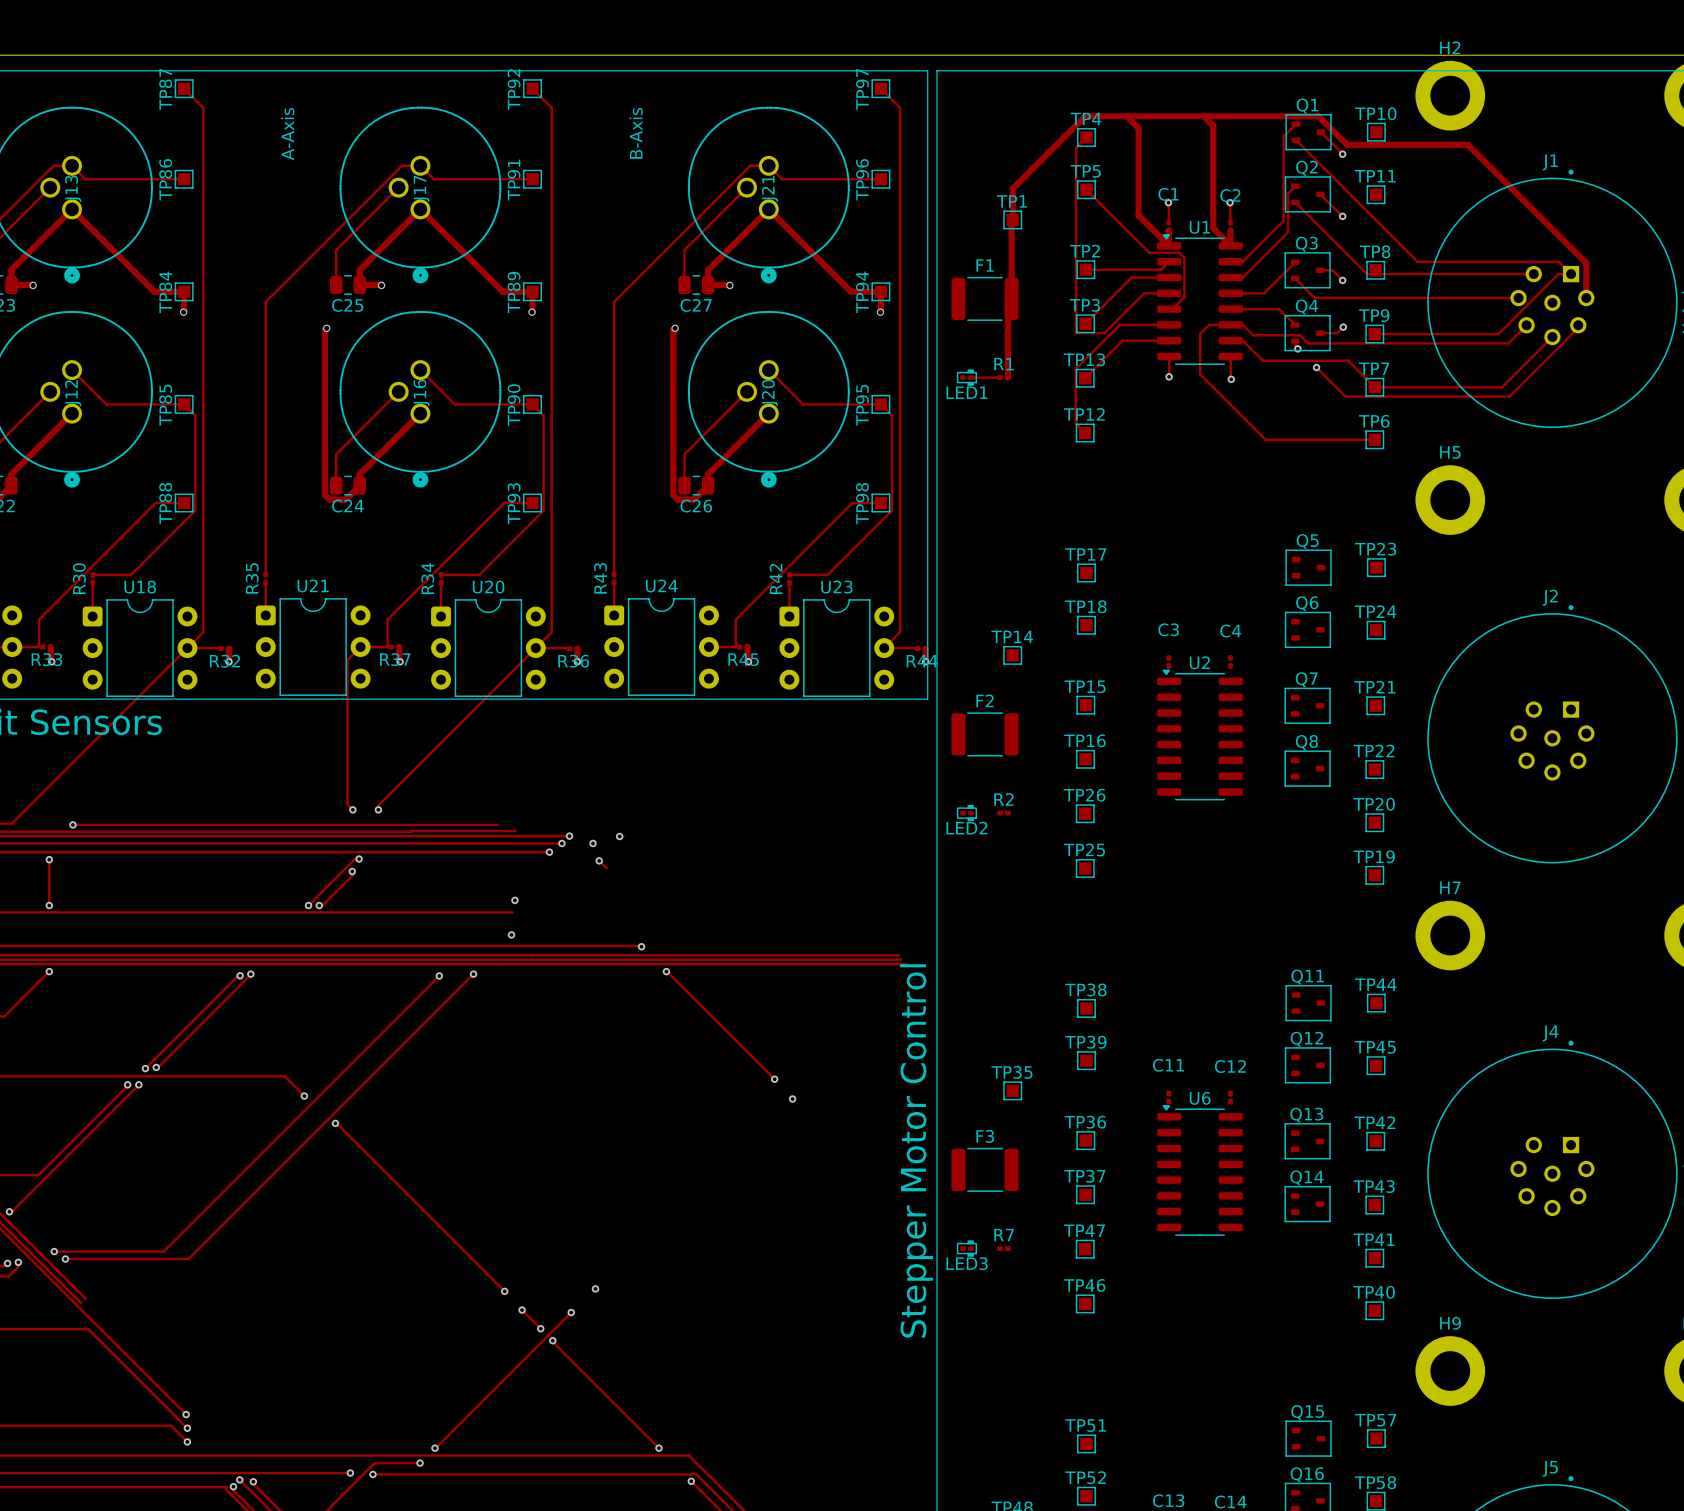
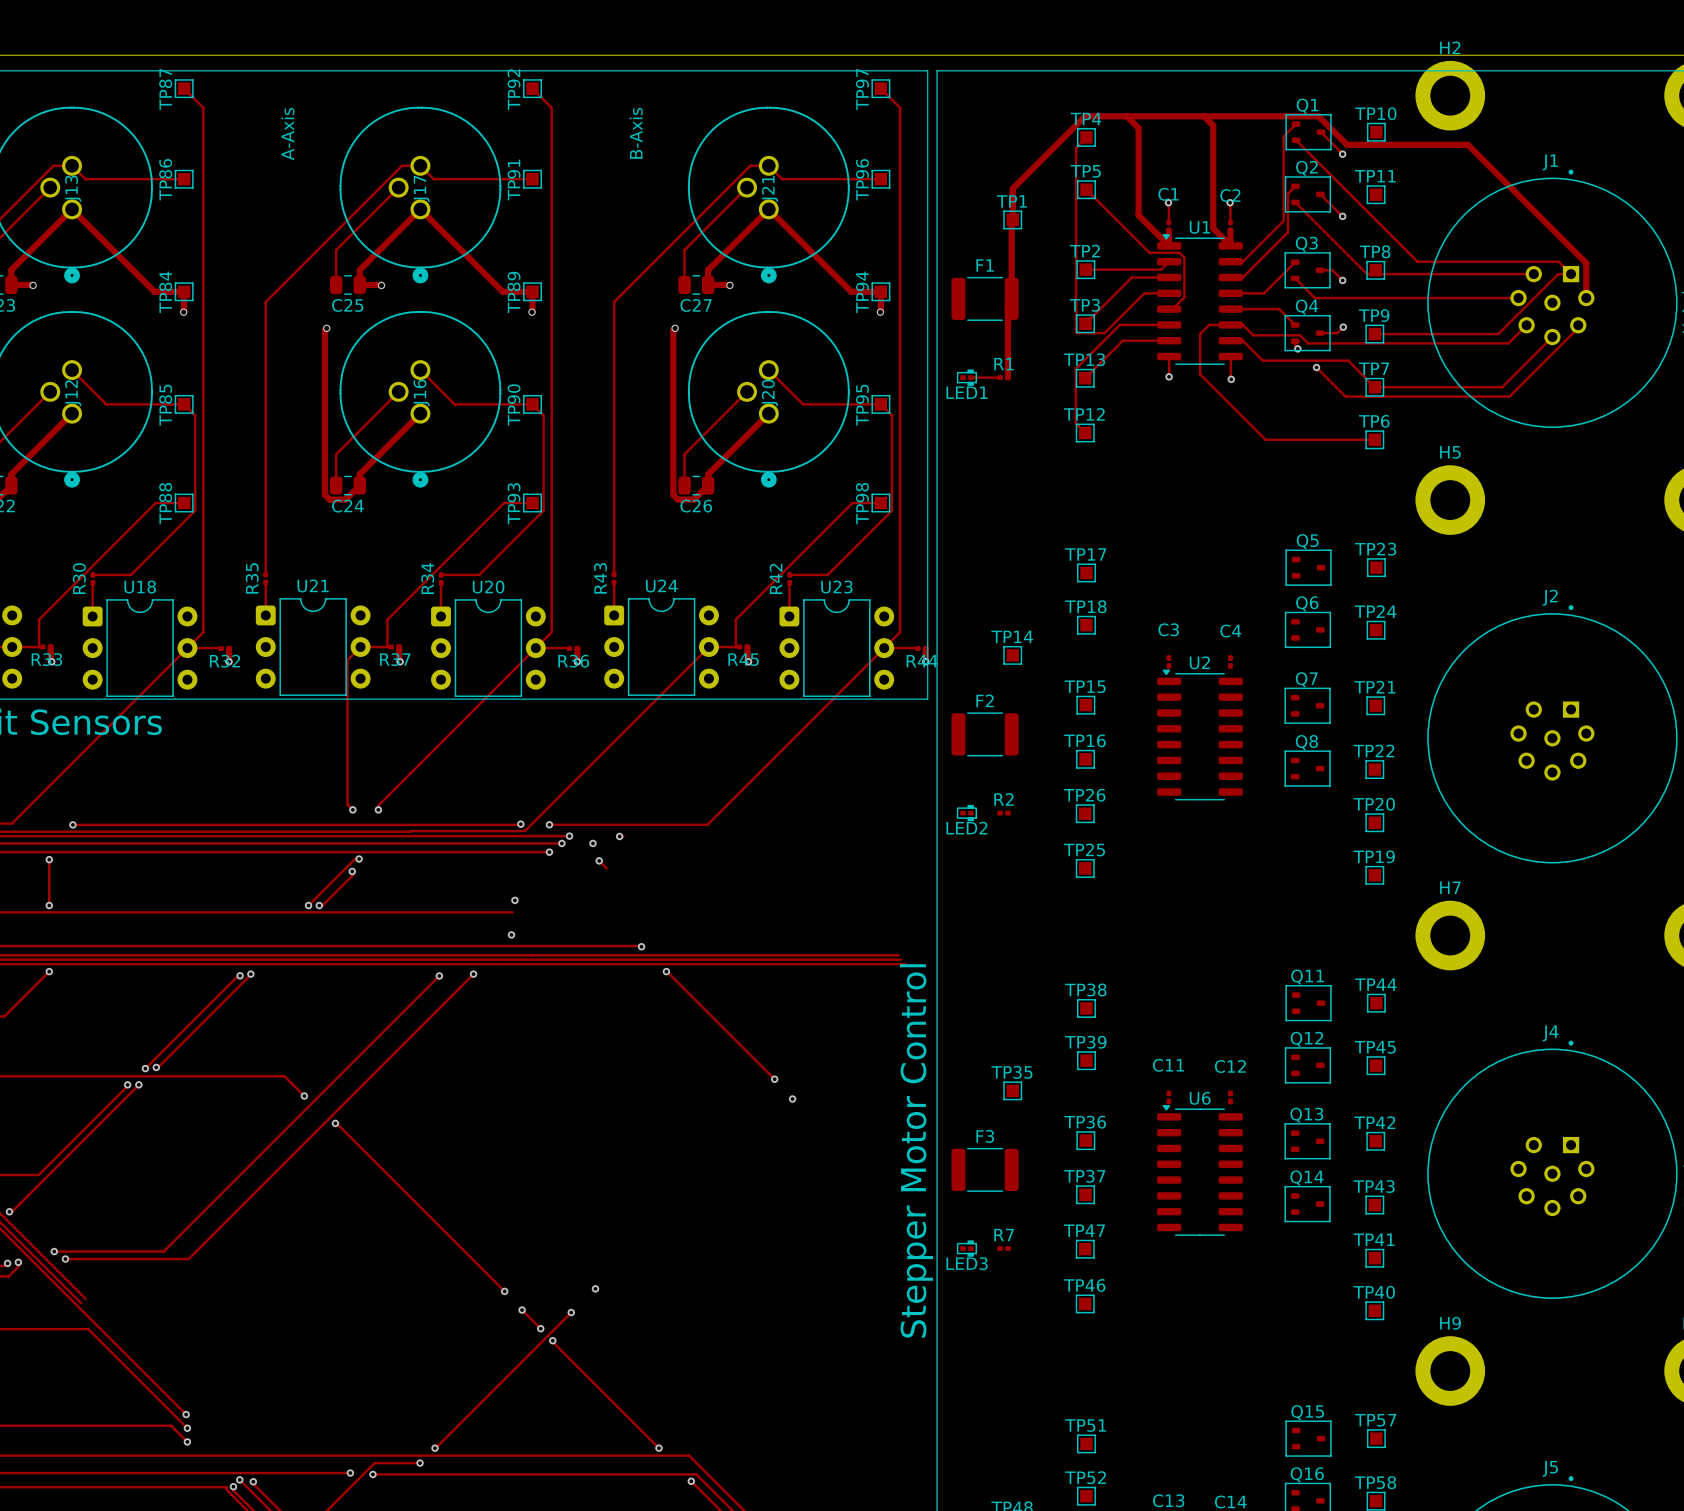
track: none -> (708, 647) (524, 831) (515, 831)
track: none -> (884, 648) (707, 824) (549, 824)
track: none -> (520, 824) (497, 824)
via: none -> (520, 824)
via: none -> (549, 824)

